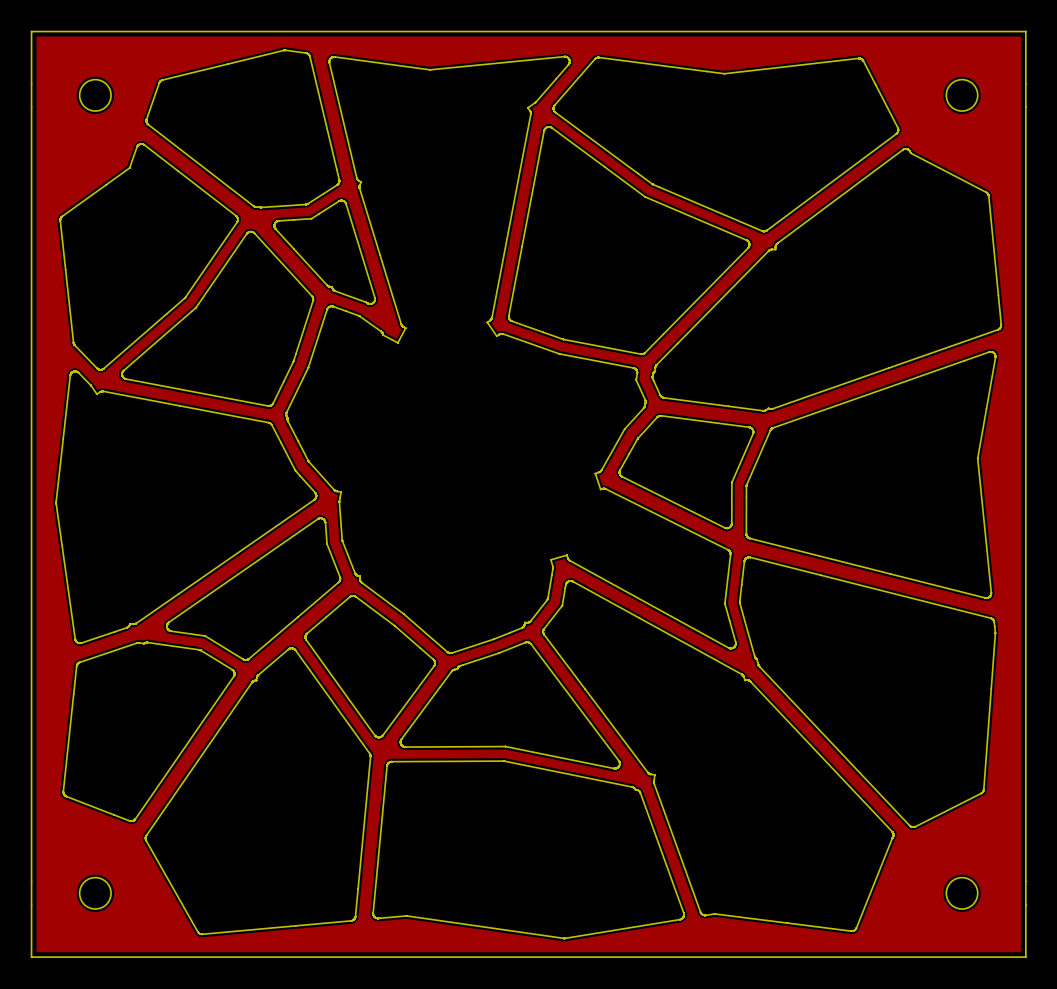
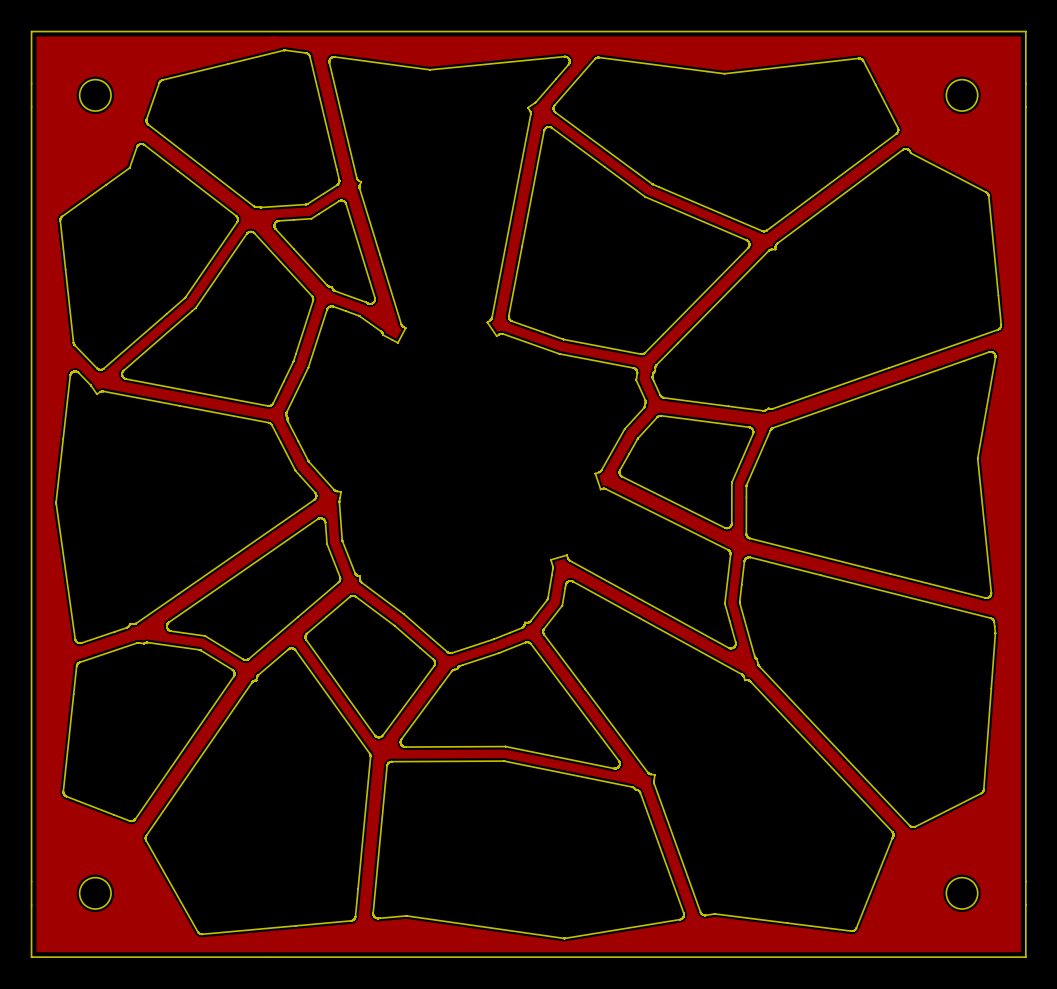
drawing shape: [274, 36, 380, 953] -> [271, 36, 380, 953]

